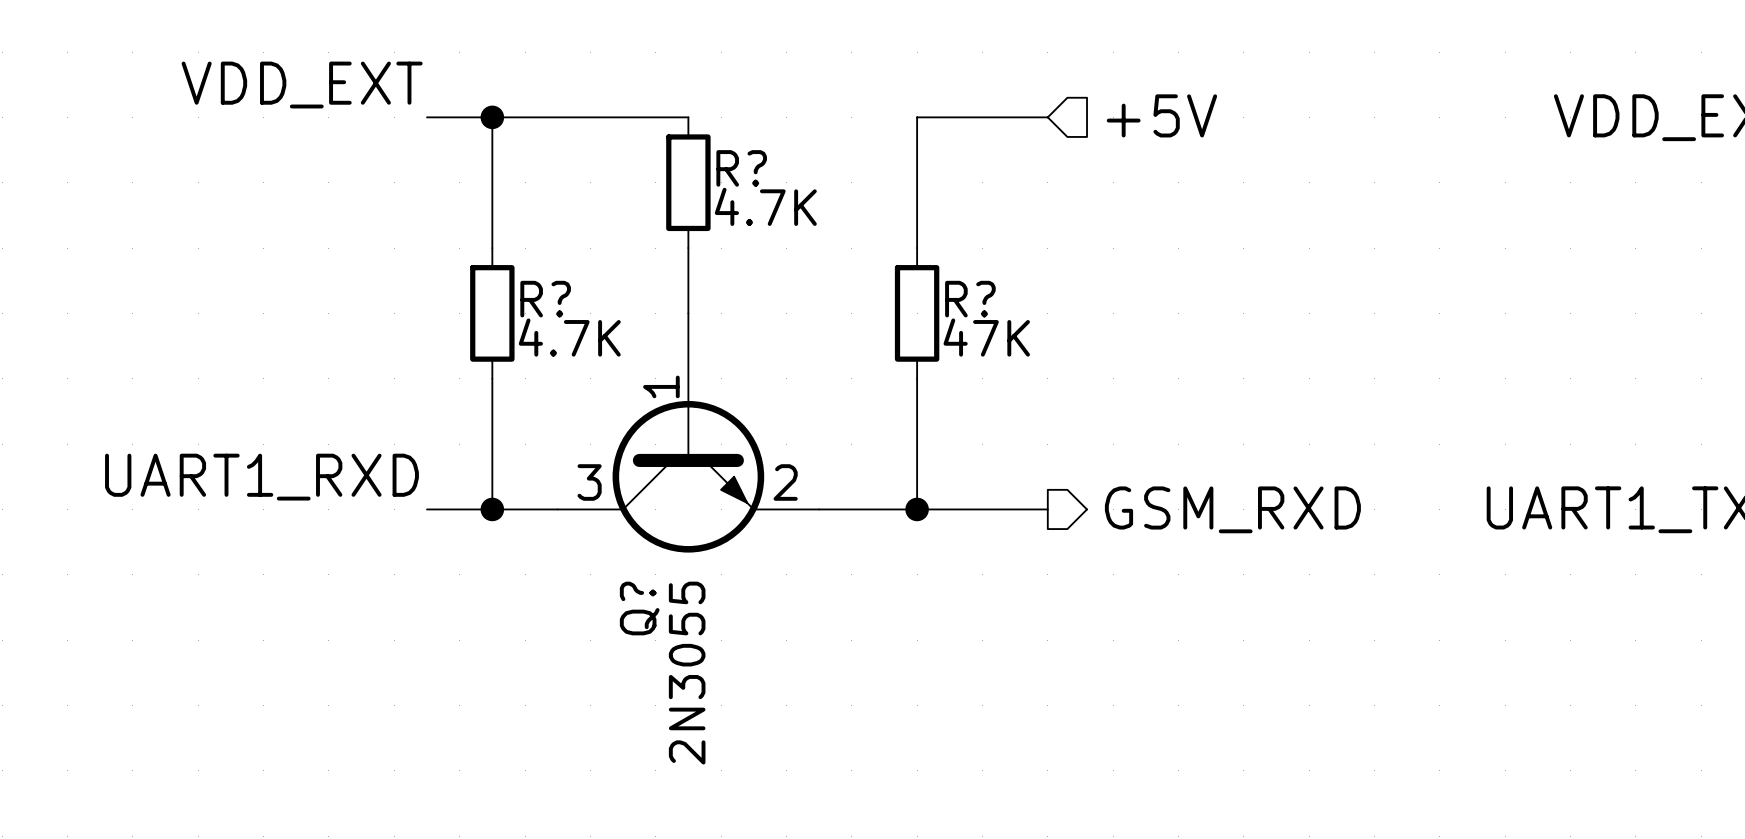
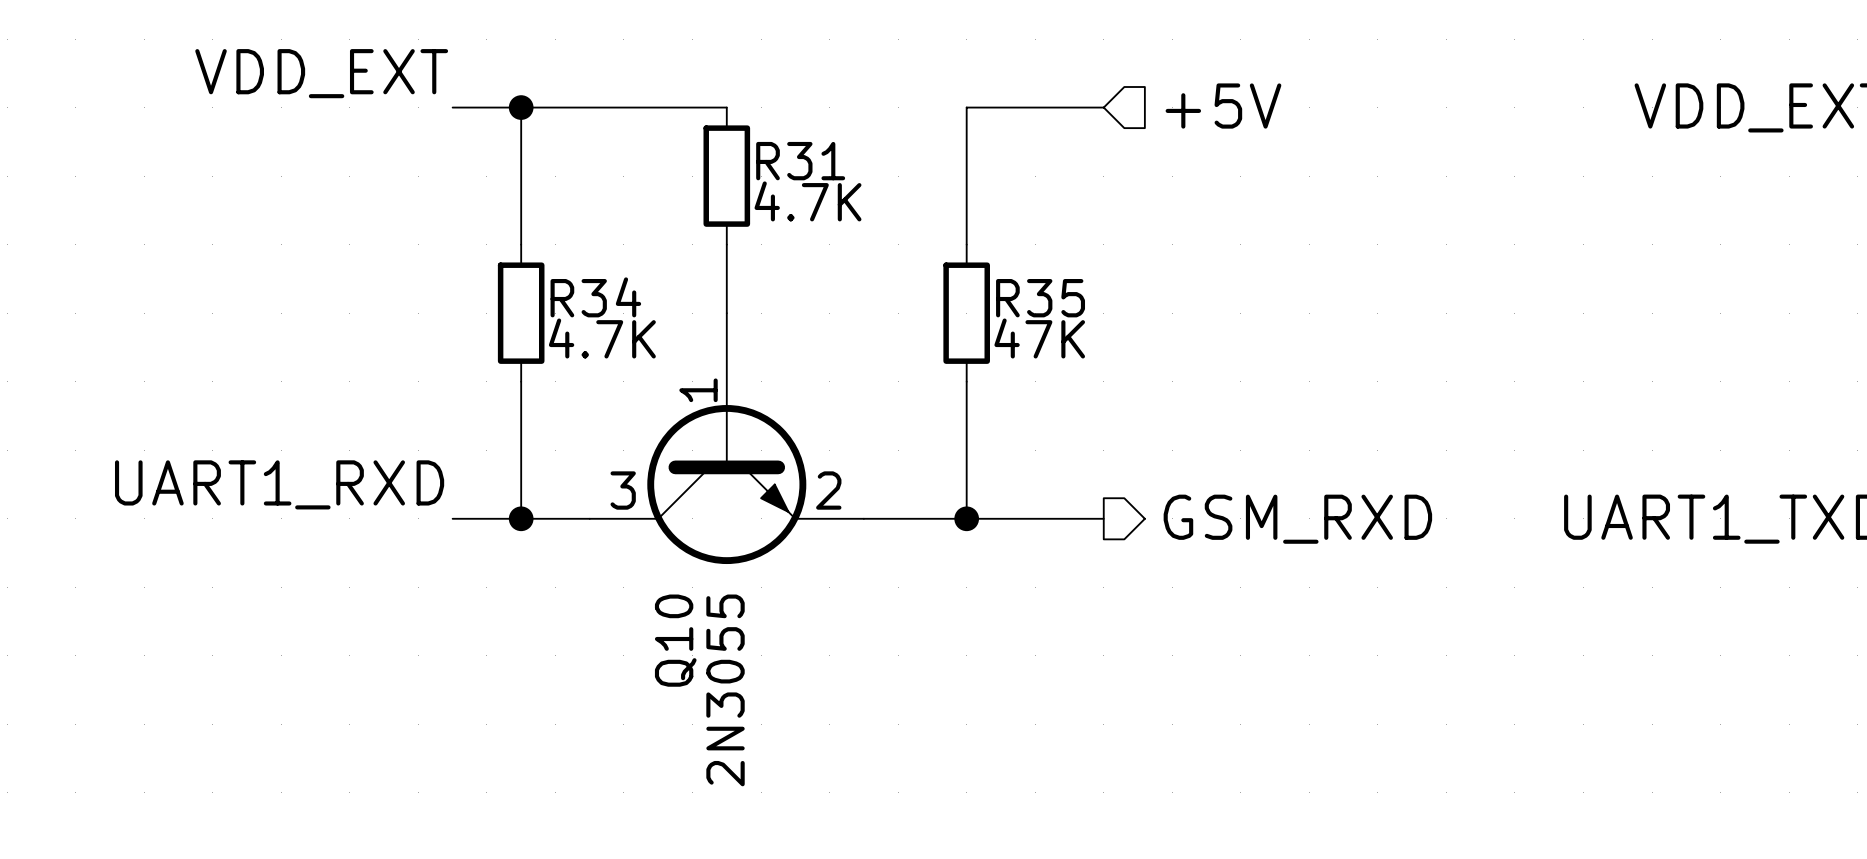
R? name: R? (741, 168) -> R31 (800, 161)
R? name: R? (545, 299) -> R34 (595, 297)
R? name: R? (970, 299) -> R35 (1040, 298)
Q? name: Q? (639, 608) -> Q10 (675, 640)

